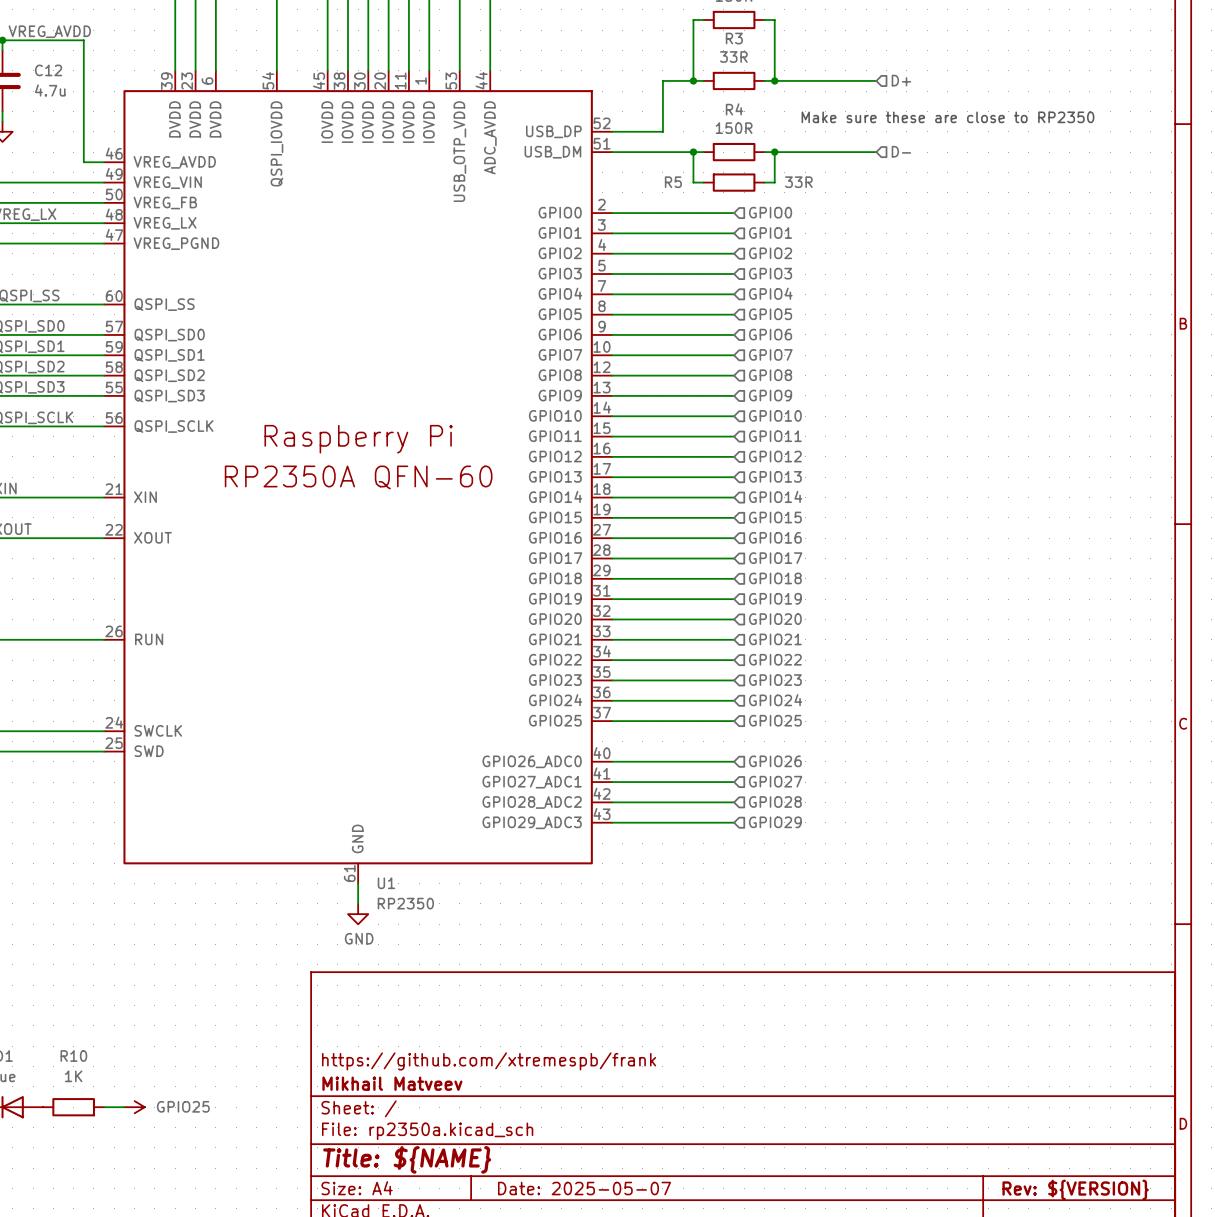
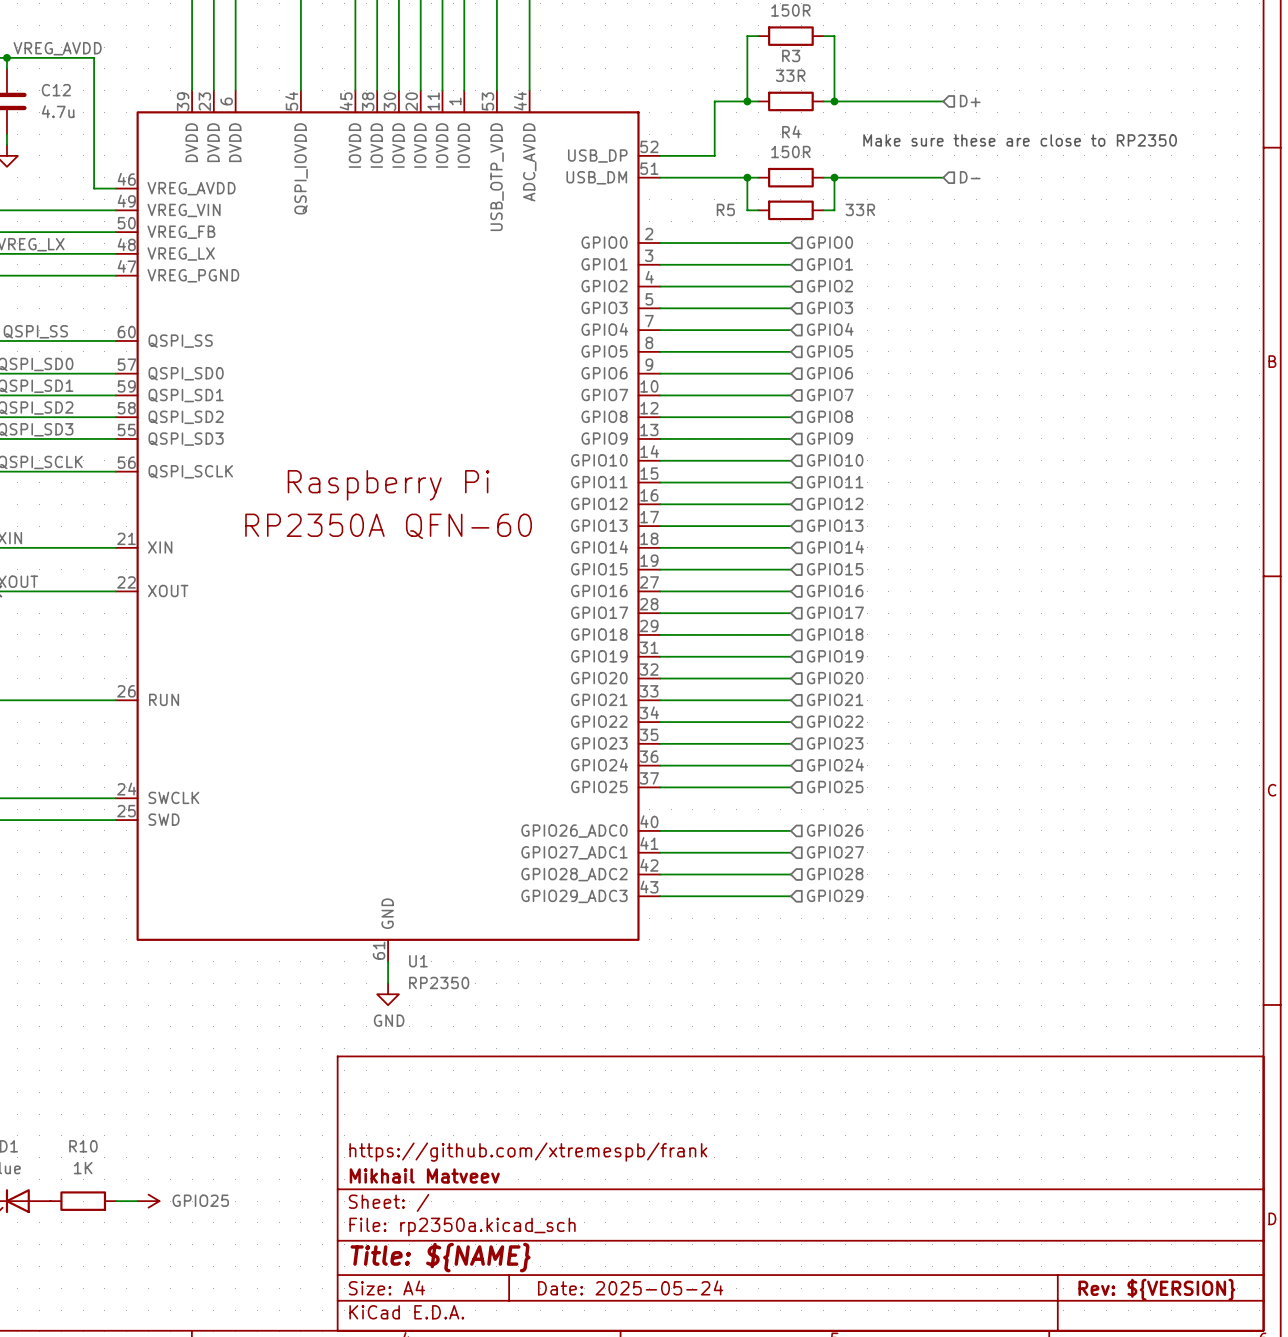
title block: Date: 2025-05-07 (584, 1188) -> Date: 2025-05-24 (630, 1287)

